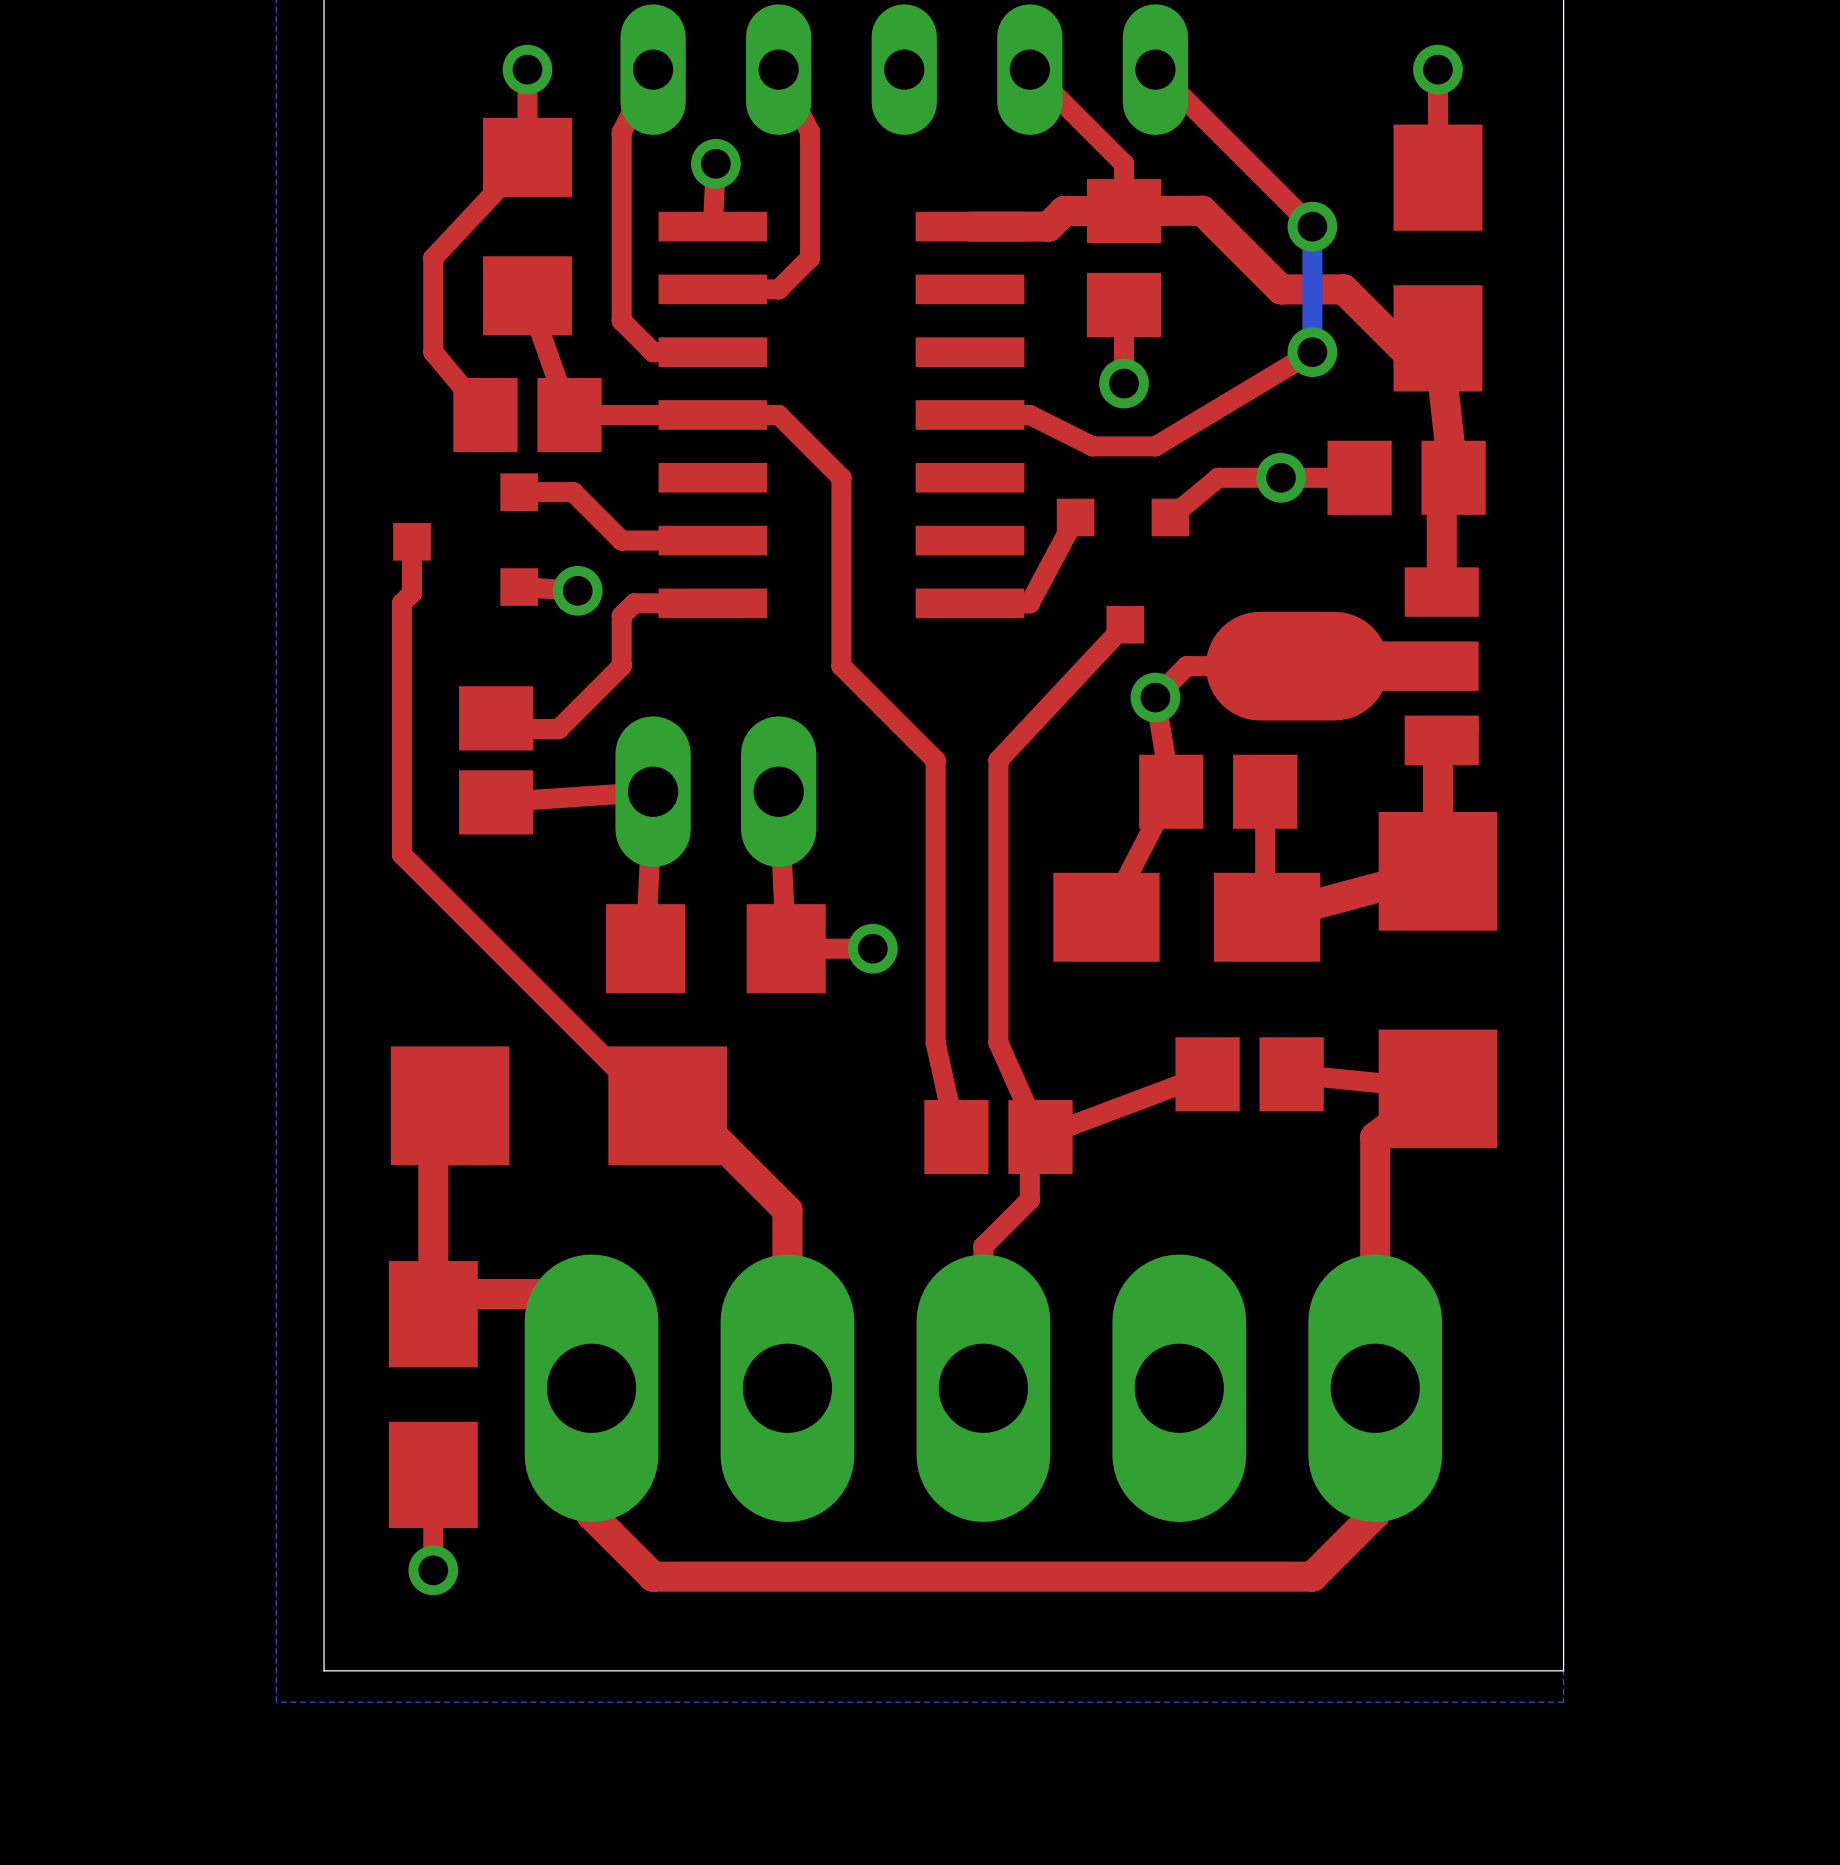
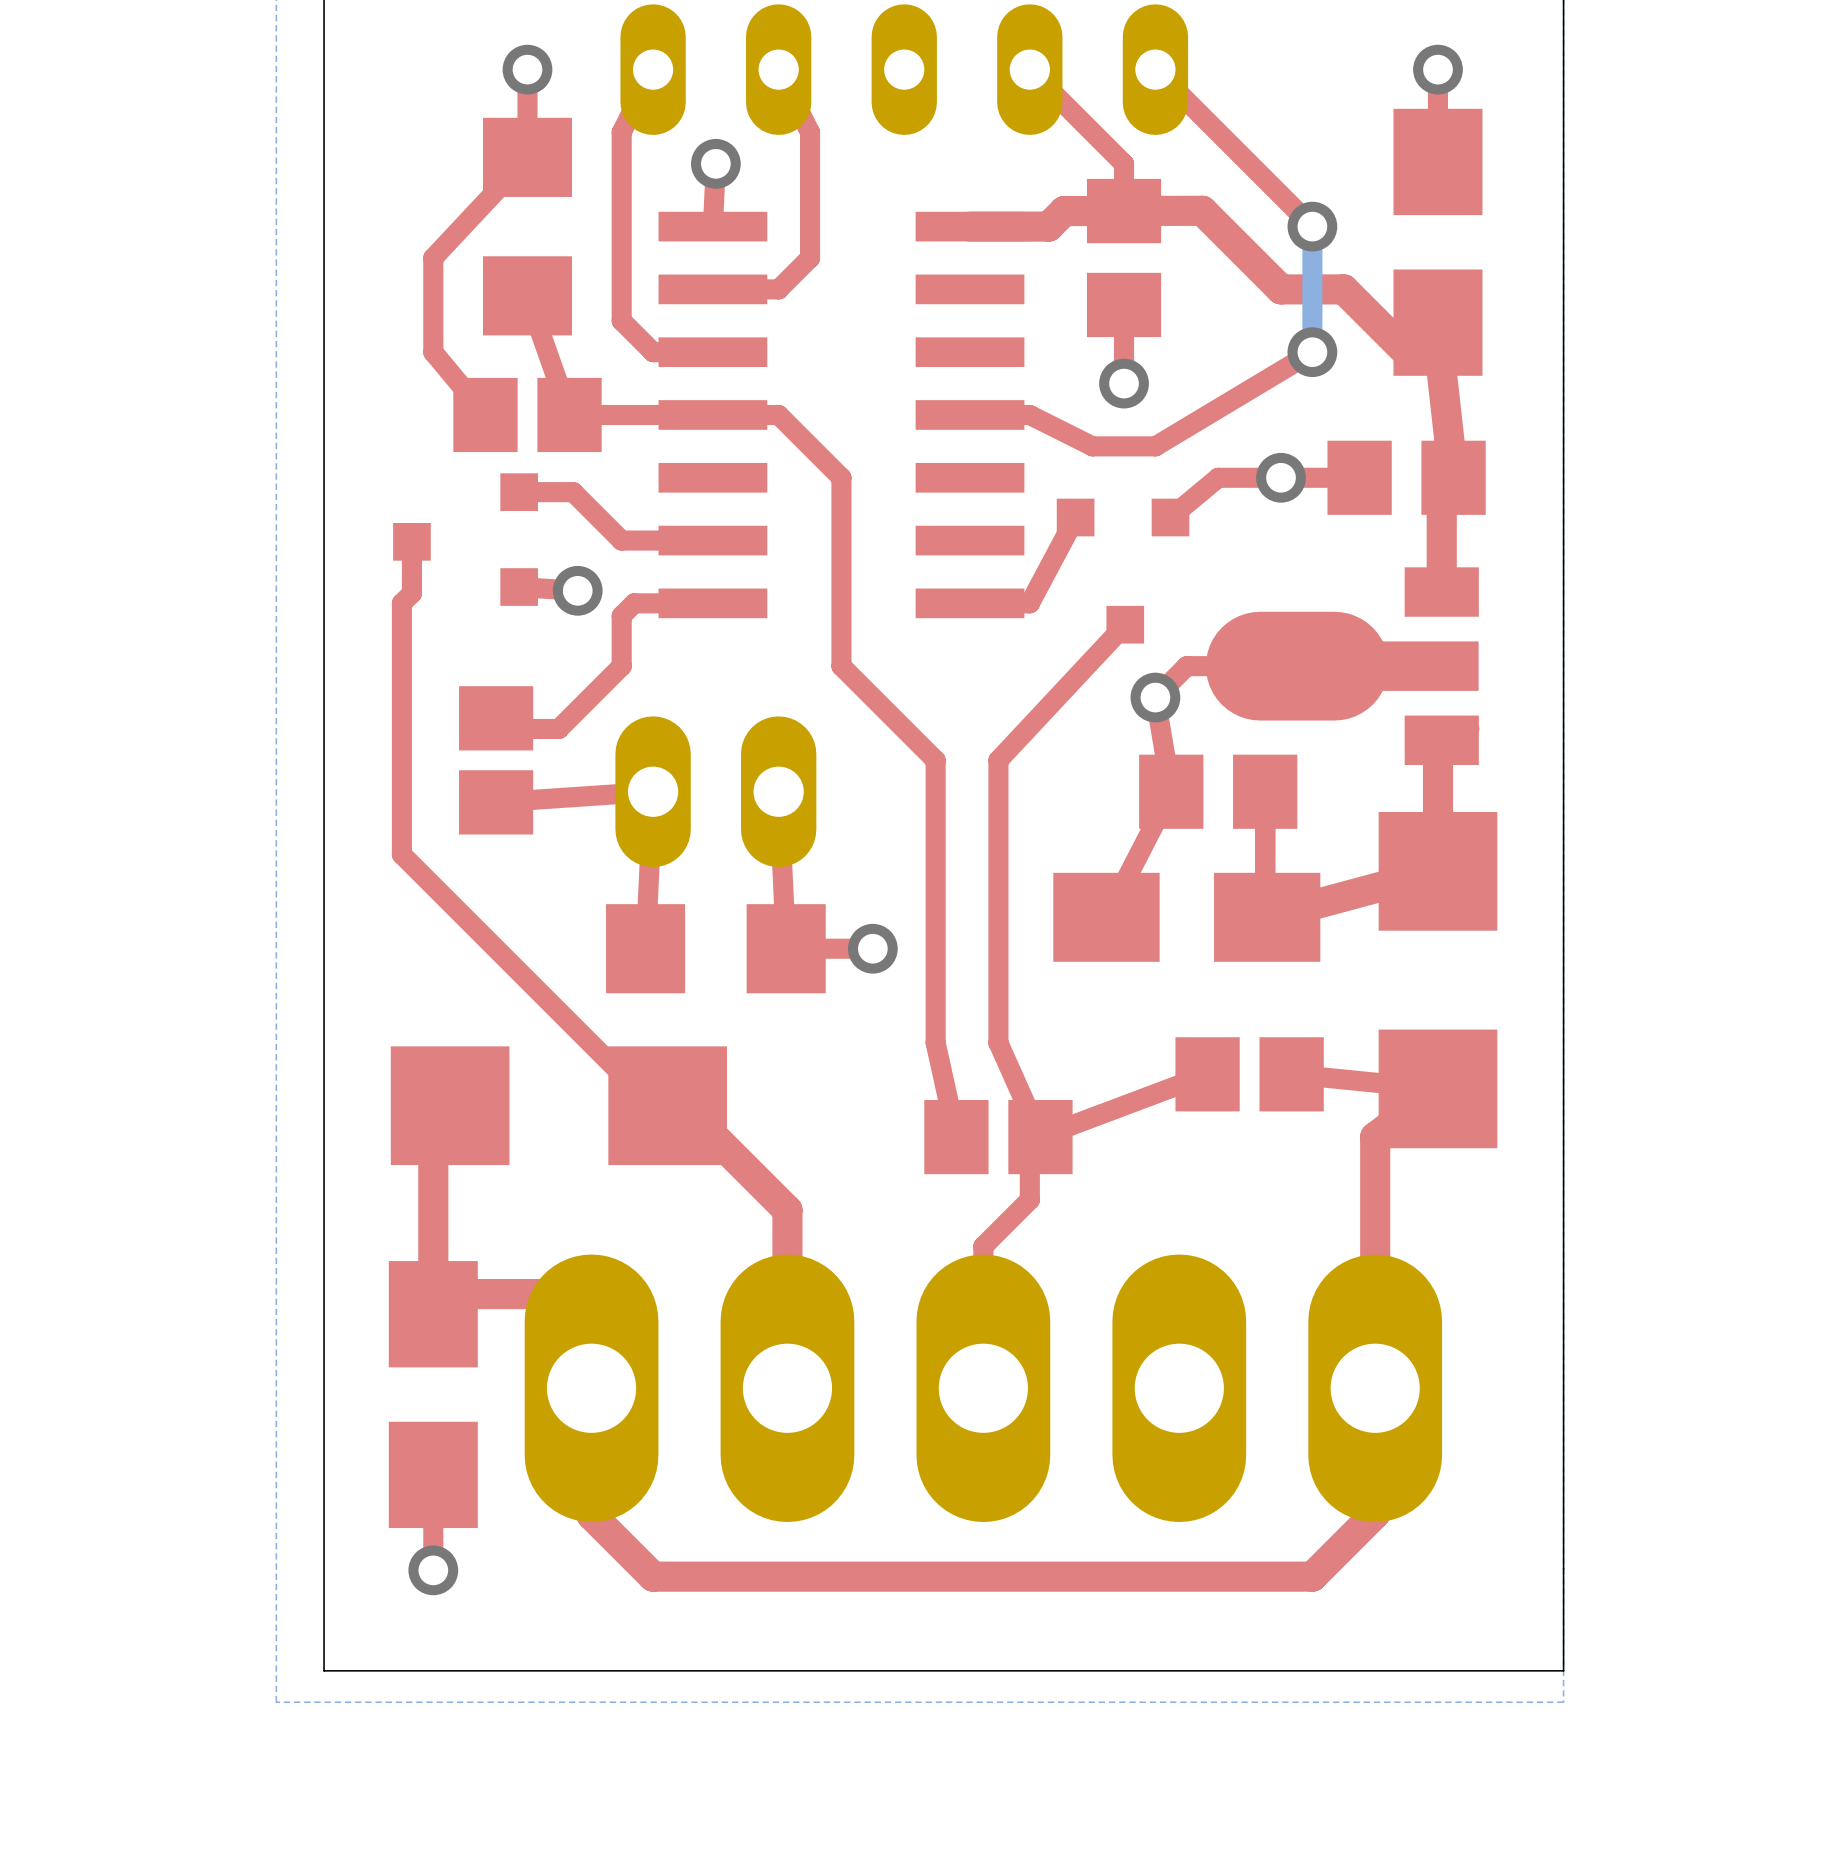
part position: (1437, 258) -> (1437, 242)

